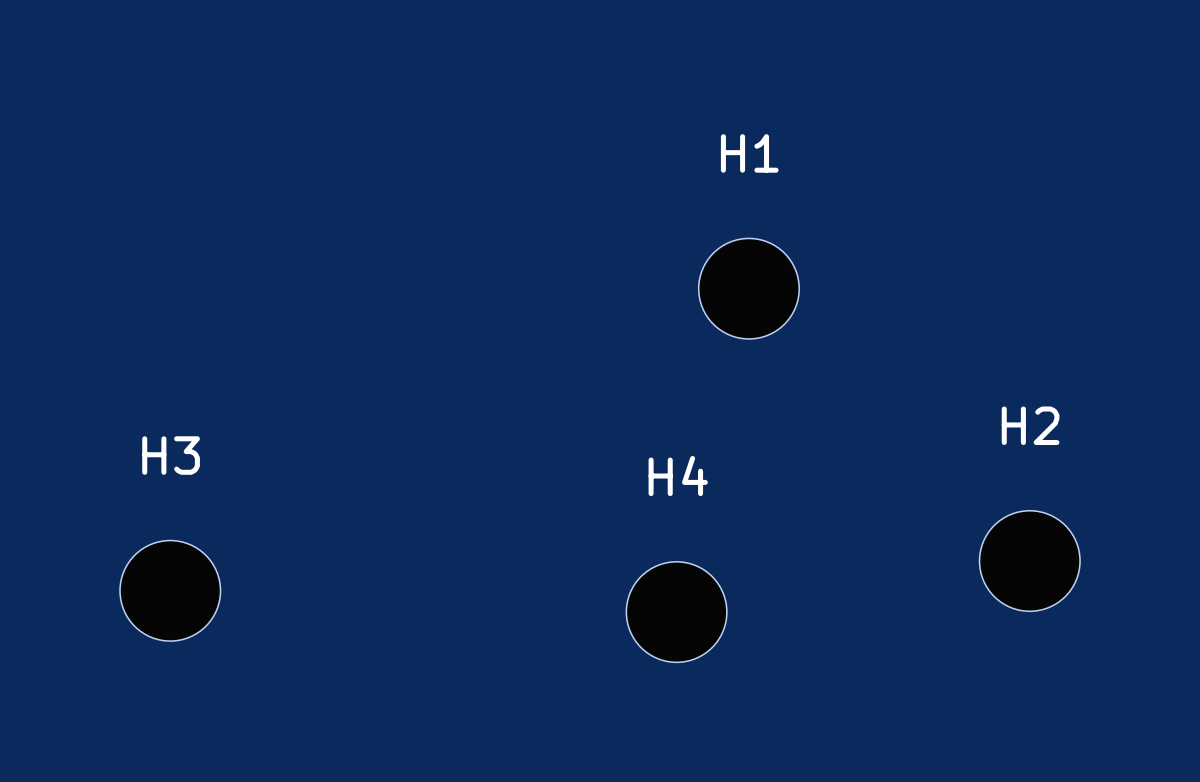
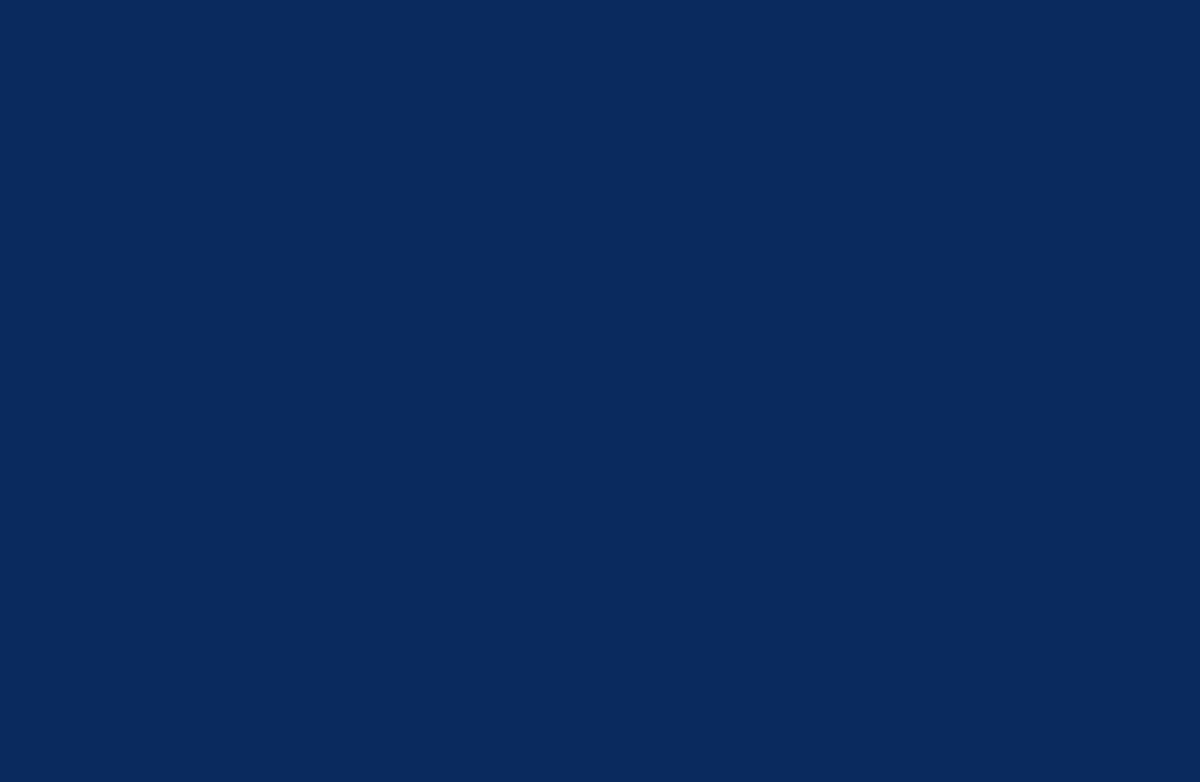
H1: (748, 288) -> none
H2: (1029, 561) -> none
H3: (170, 590) -> none
H4: (676, 612) -> none

